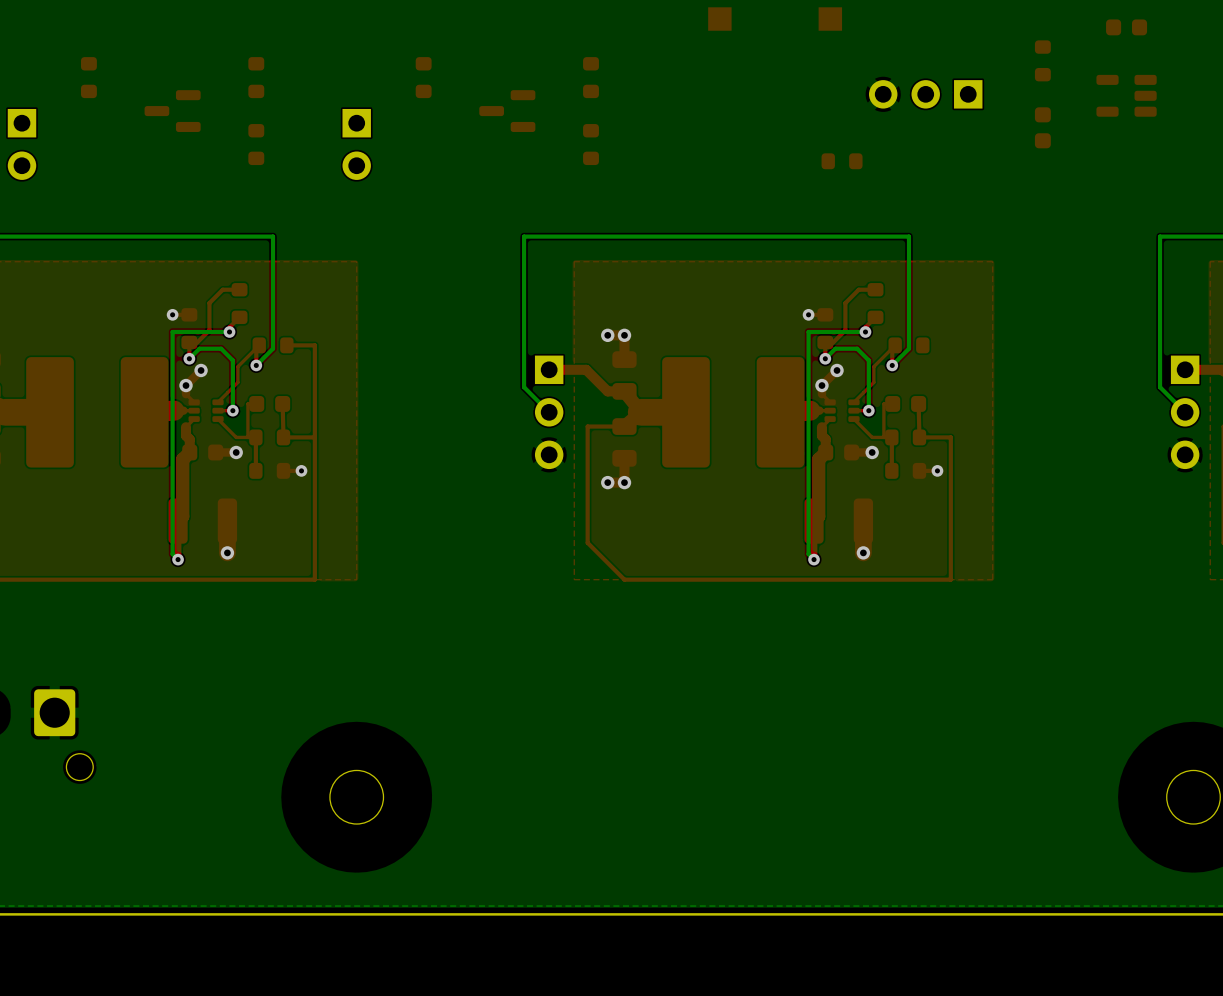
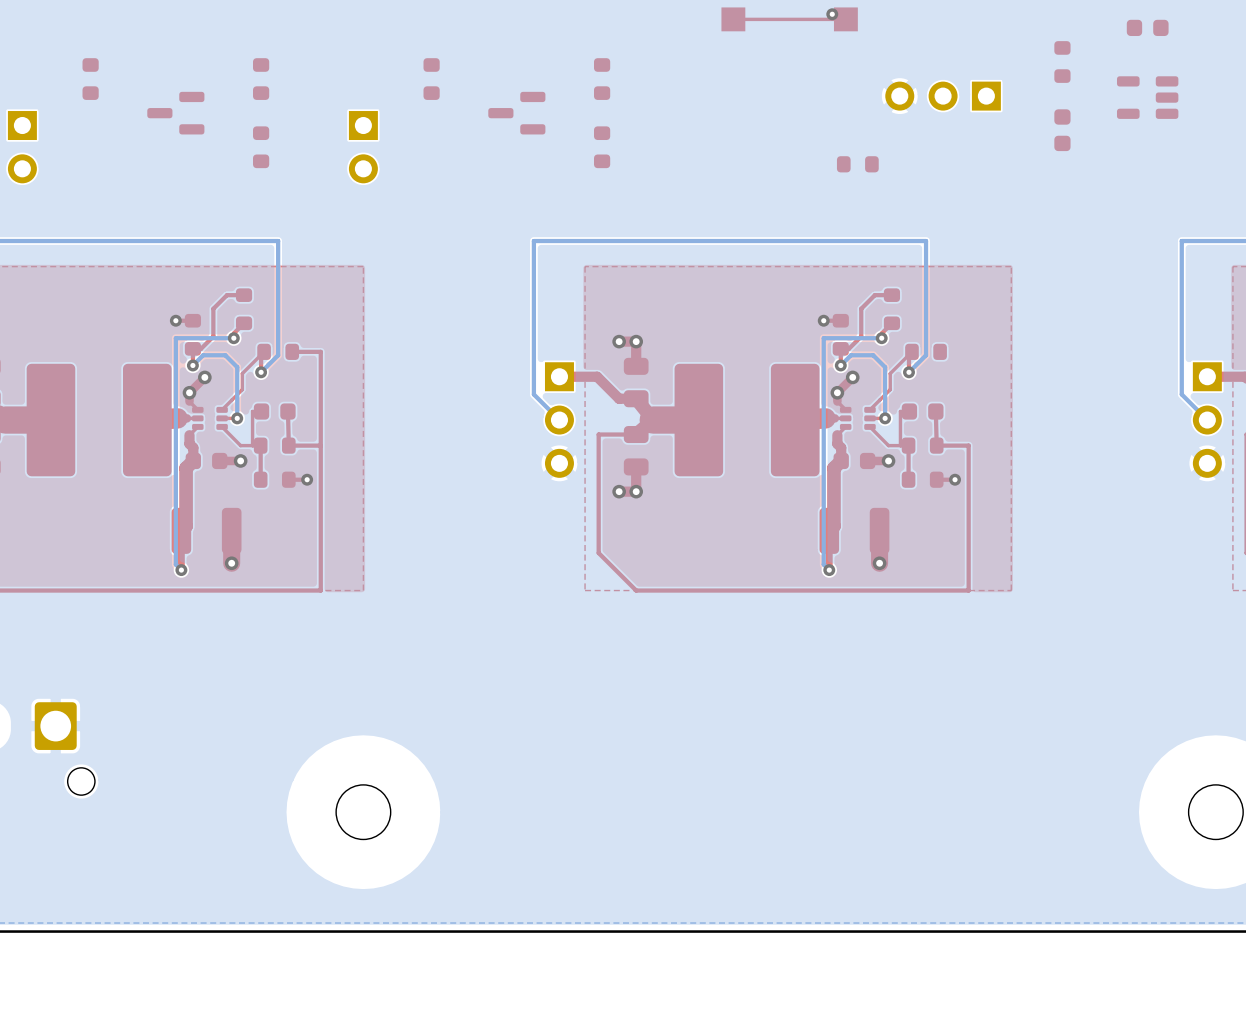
via: none -> (832, 14)
top track: none -> (845, 19) (733, 19)

